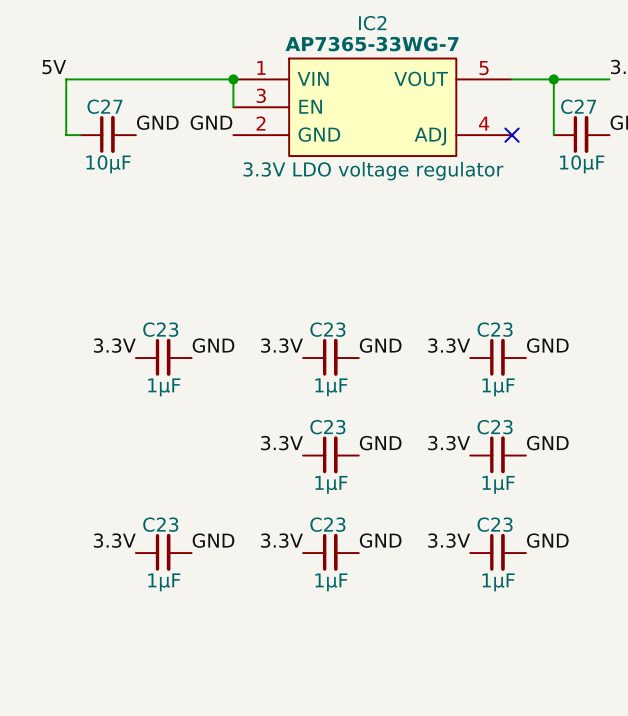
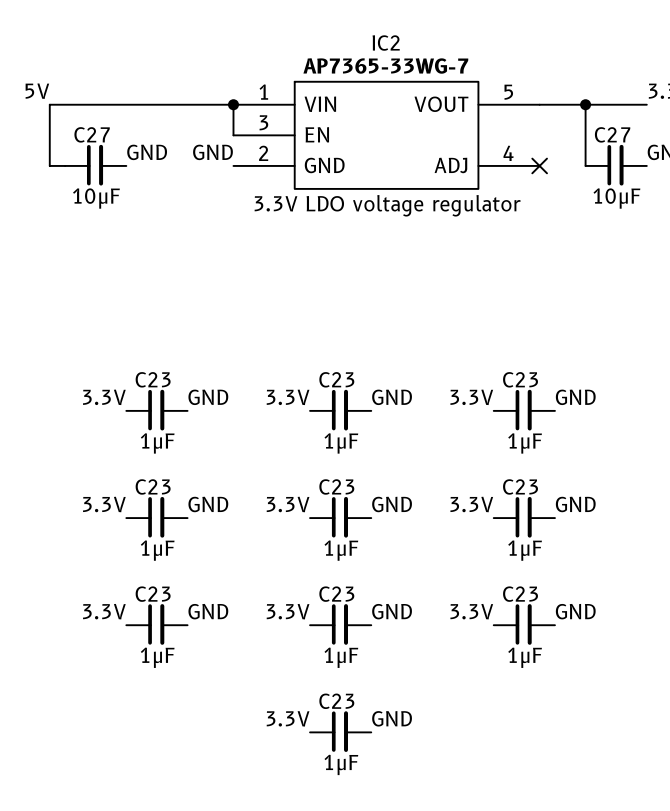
label: none -> 3.3V (104, 504)
label: none -> GND (208, 504)
C23: none -> 1μF (156, 517)
label: none -> 3.3V (288, 718)
label: none -> GND (392, 718)
C23: none -> 1μF (340, 731)

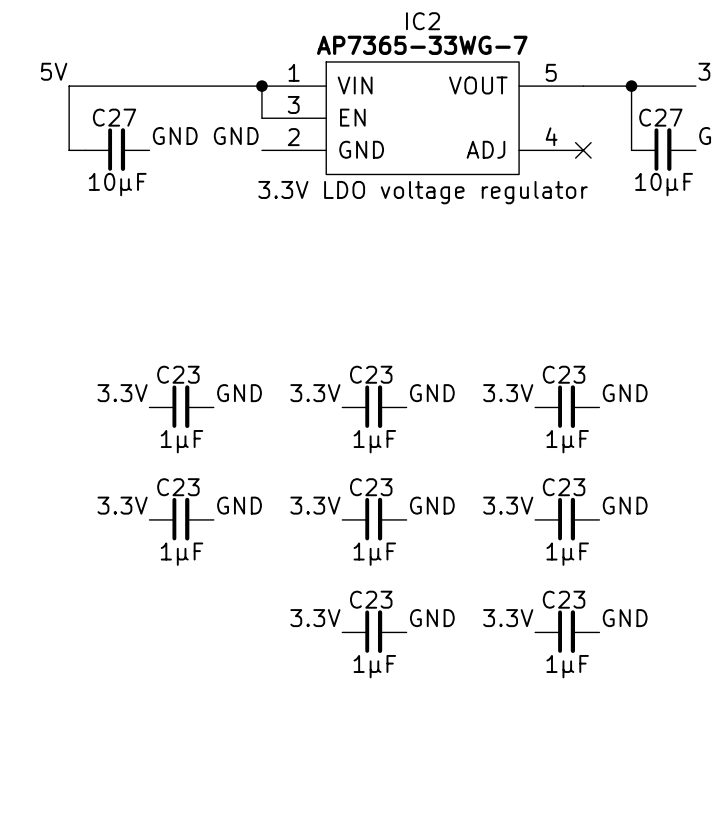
label: 3.3V (104, 611) -> none
label: GND (208, 611) -> none
C23: 1μF (156, 624) -> none
label: 3.3V (288, 718) -> none
label: GND (392, 718) -> none
C23: 1μF (340, 731) -> none

